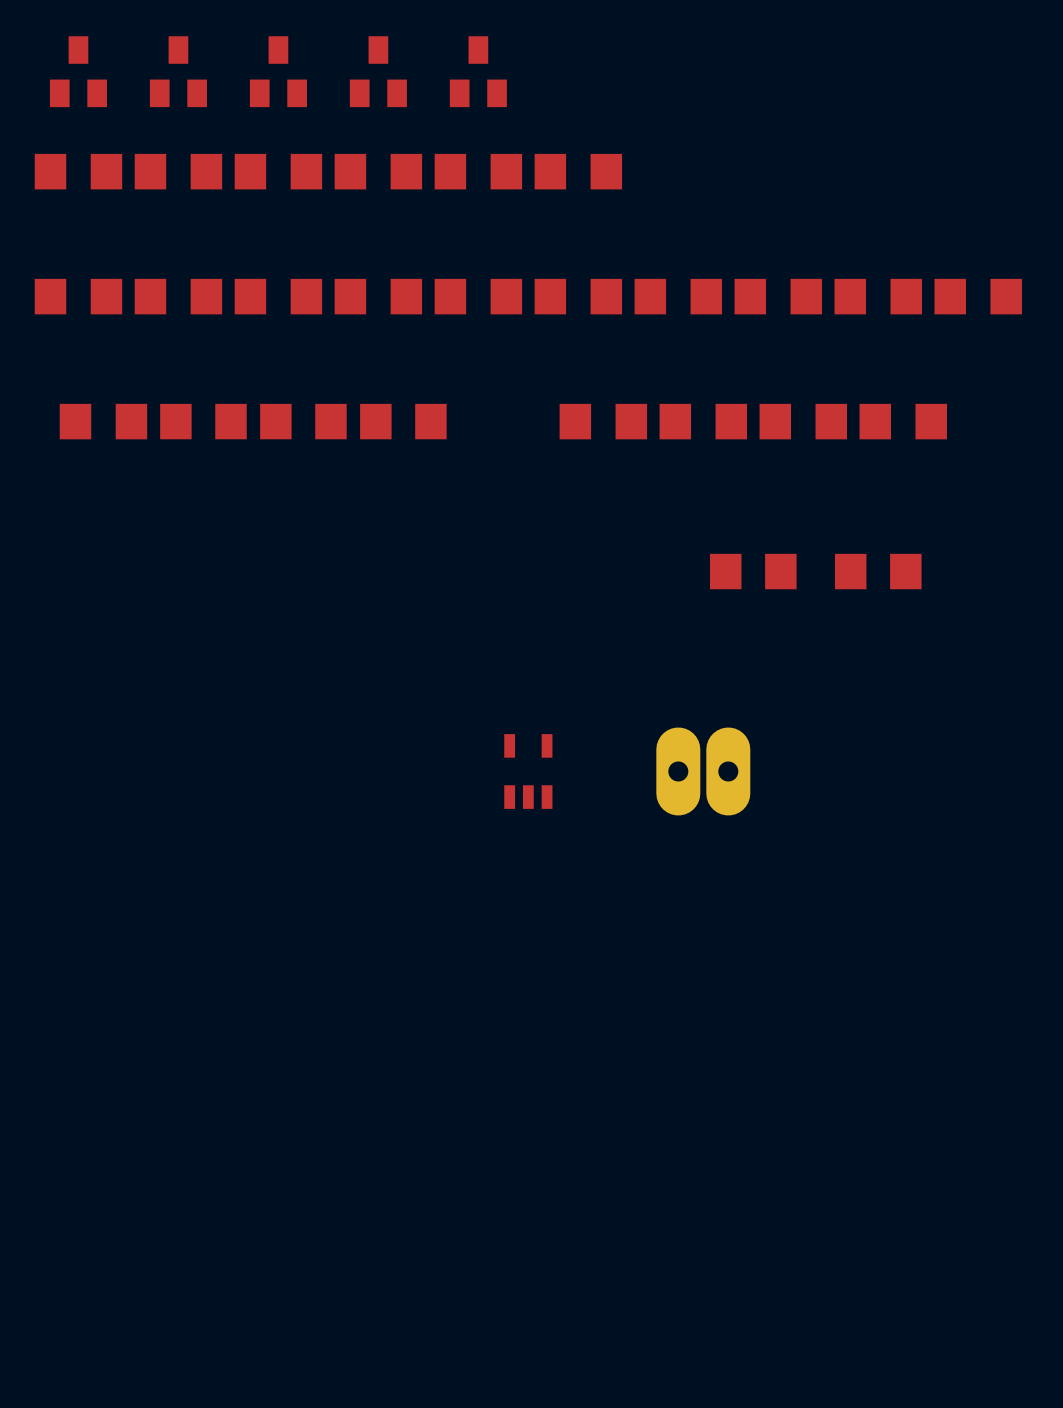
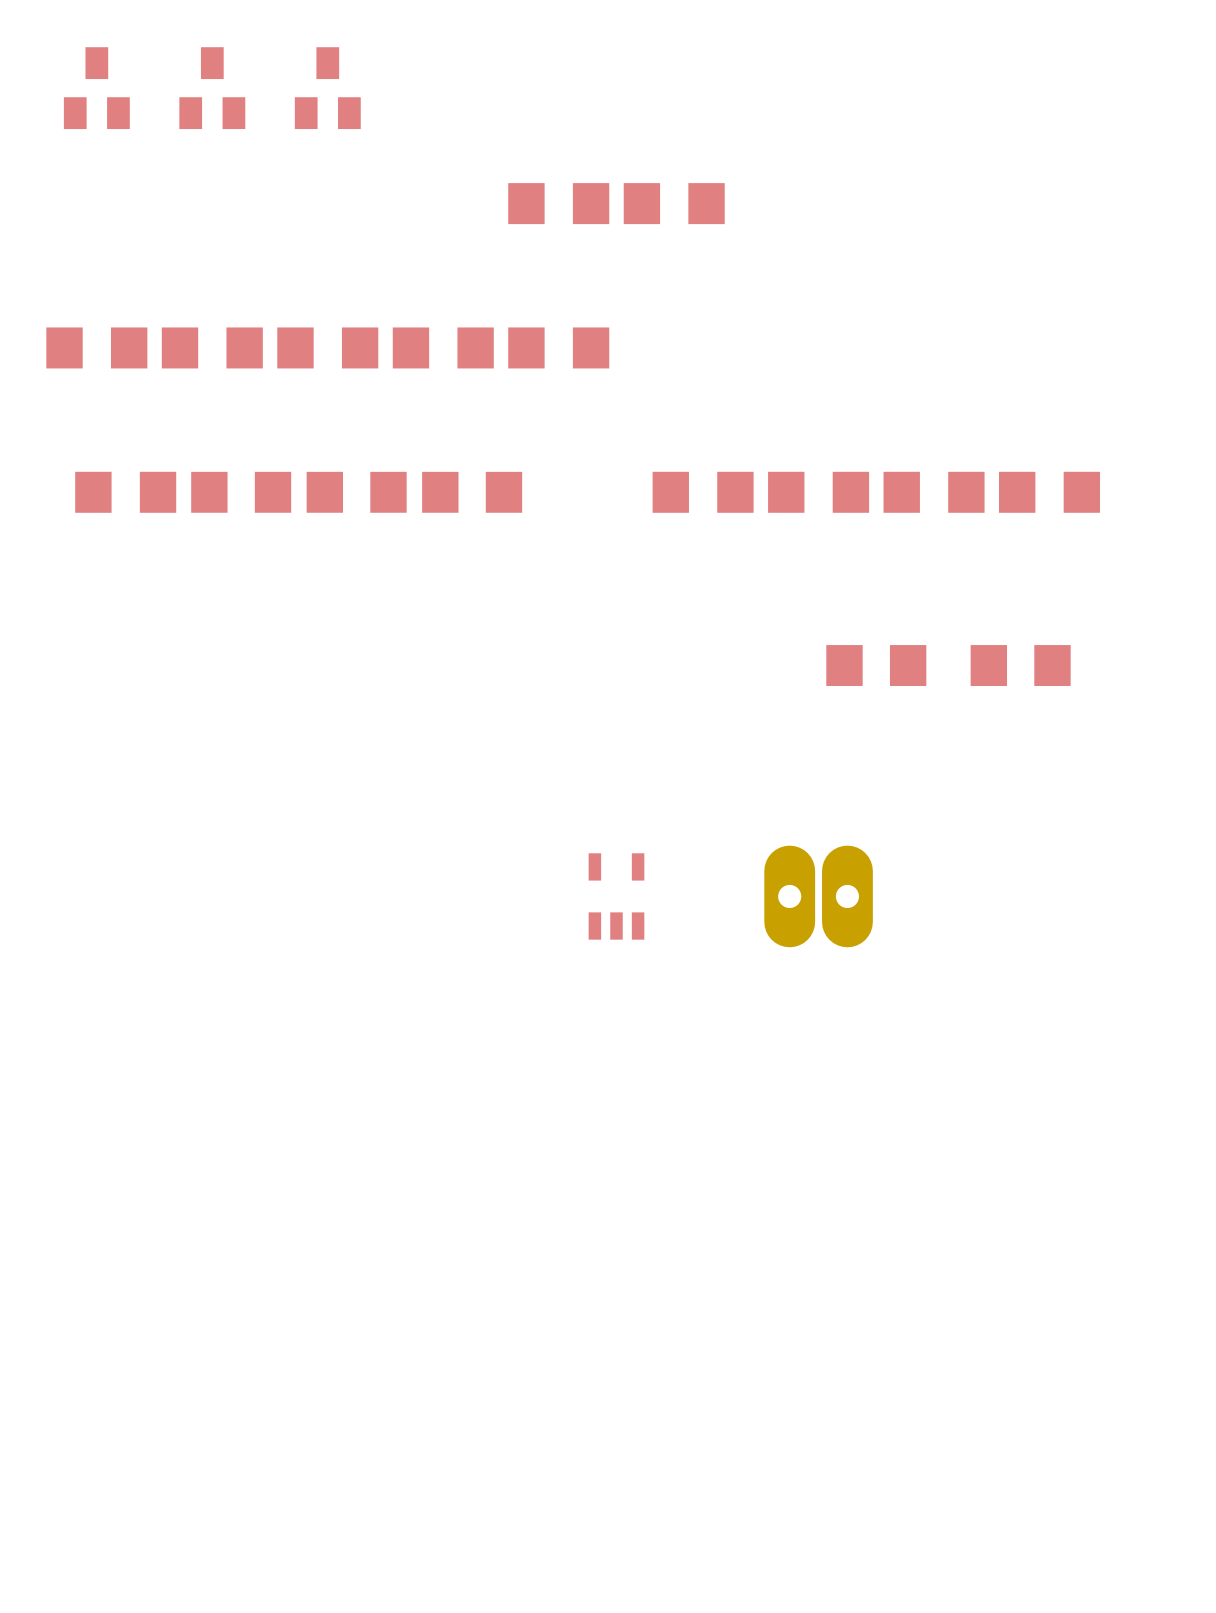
part: (378, 71) -> none
part: (478, 71) -> none
part: (78, 171) -> none
part: (178, 171) -> none
part: (278, 171) -> none
part: (378, 171) -> none
part: (578, 296) -> none
part: (678, 296) -> none
part: (778, 296) -> none
part: (878, 296) -> none
part: (978, 296) -> none

